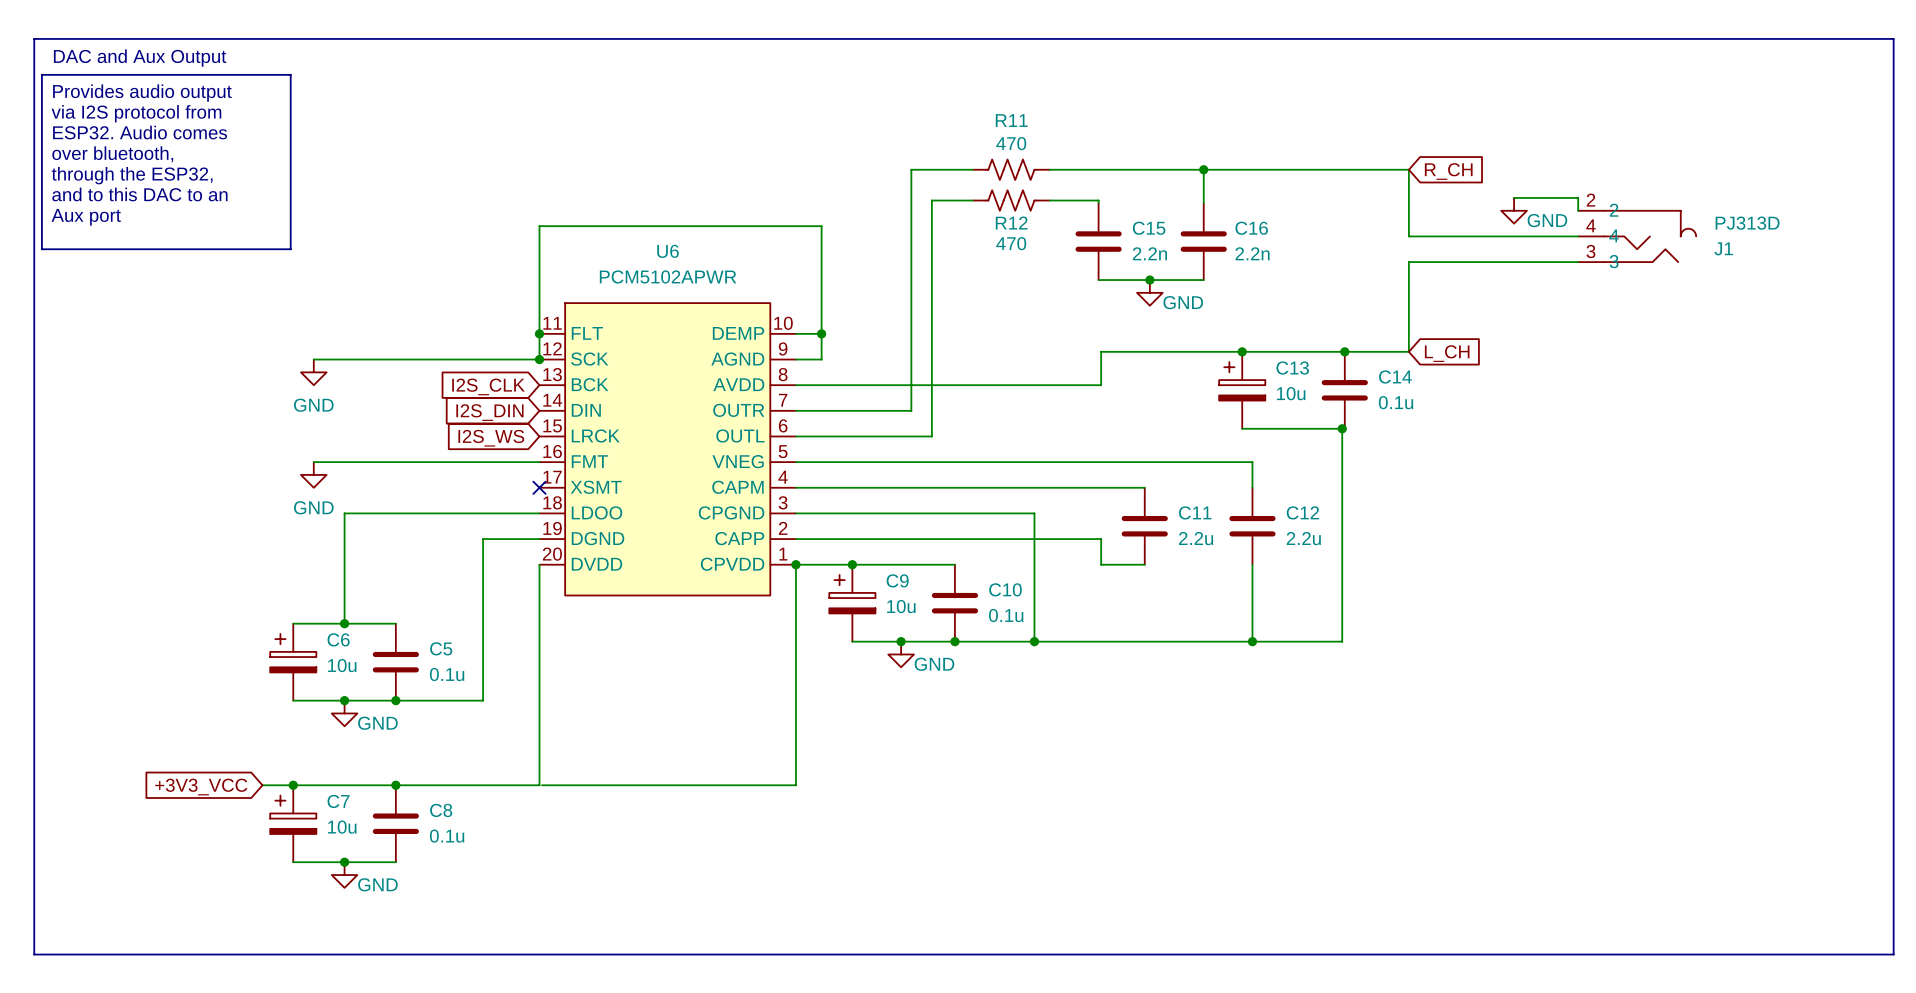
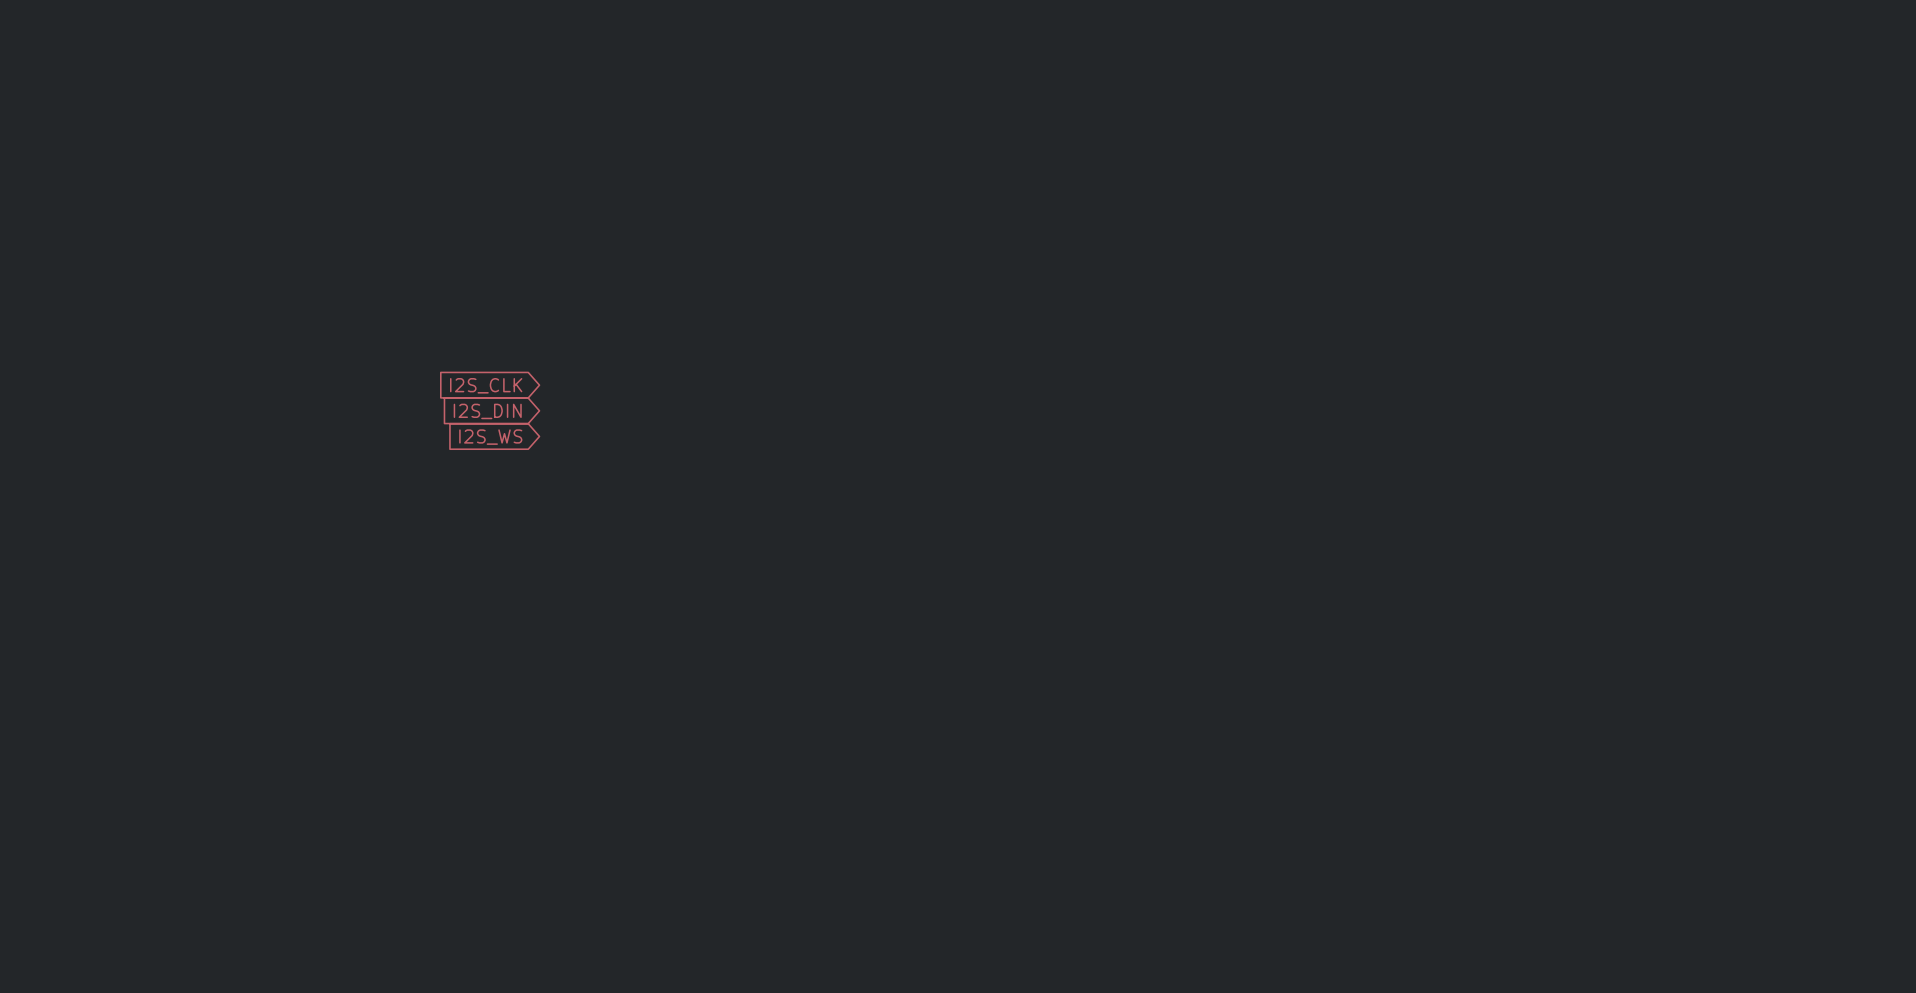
line: (34, 38) (1893, 38) (1893, 954) (34, 954) (34, 38) -> none
text: DAC and Aux Output (140, 58) -> none
line: (41, 74) (290, 74) (290, 249) (41, 249) (41, 74) -> none
text: Provides audio output (142, 93) -> none
text: via I2S protocol from (136, 113) -> none
text: ESP32. Audio comes (140, 132) -> none
text: over bluetooth, (112, 154) -> none
wire: (972, 169) (911, 169) (911, 410) (795, 410) -> none
R11: 470 (1011, 169) -> none
wire: (1049, 169) (1408, 169) (1408, 236) (1578, 236) -> none
wire: (1203, 169) (1203, 203) -> none
junction: (1203, 169) -> none
global label: R_CH (1448, 171) -> none
text: through the ESP32, (132, 175) -> none
text: and to this DAC to an (139, 194) -> none
wire: (1514, 197) (1578, 197) (1578, 210) -> none
wire: (972, 200) (931, 200) (931, 436) (795, 436) -> none
R12: 470 (1011, 200) -> none
wire: (1049, 200) (1098, 200) (1098, 203) -> none
power symbol: GND (1514, 210) -> none
text: Aux port (86, 217) -> none
J1: PJ313D (1637, 236) -> none
C15: 2.2n (1098, 241) -> none
C16: 2.2n (1203, 241) -> none
wire: (1578, 262) (1408, 262) (1408, 351) (1101, 351) (1101, 385) (795, 385) -> none
wire: (1098, 280) (1203, 280) -> none
junction: (1149, 280) -> none
power symbol: GND (1149, 292) -> none
junction: (539, 333) -> none
wire: (795, 333) (821, 333) -> none
junction: (821, 333) -> none
junction: (1242, 351) -> none
junction: (1344, 351) -> none
global label: L_CH (1447, 353) -> none
wire: (313, 359) (539, 359) (539, 226) (821, 226) (821, 359) (795, 359) -> none
junction: (539, 359) -> none
power symbol: GND (313, 372) -> none
C13: 10u (1242, 390) -> none
C14: 0.1u (1344, 390) -> none
wire: (1242, 428) (1344, 428) -> none
wire: (1342, 428) (1342, 641) (852, 641) -> none
junction: (1342, 428) -> none
U6: PCM5102APWR (667, 449) -> none
wire: (313, 462) (539, 462) -> none
wire: (795, 462) (1252, 462) (1252, 487) -> none
power symbol: GND (313, 474) -> none
no-connect mark: (539, 487) -> none
wire: (795, 487) (1144, 487) -> none
wire: (539, 513) (344, 513) (344, 623) -> none
wire: (795, 513) (1034, 513) (1034, 641) -> none
C11: 2.2u (1144, 526) -> none
C12: 2.2u (1252, 526) -> none
wire: (539, 539) (483, 539) (483, 700) (293, 700) -> none
wire: (795, 539) (1101, 539) (1101, 564) (1144, 564) -> none
wire: (539, 564) (539, 785) (262, 785) -> none
junction: (795, 564) -> none
junction: (852, 564) -> none
wire: (954, 564) (795, 564) (795, 785) (542, 785) -> none
wire: (1252, 564) (1252, 641) -> none
C9: 10u (852, 603) -> none
C10: 0.1u (954, 603) -> none
wire: (293, 623) (395, 623) -> none
junction: (344, 623) -> none
junction: (901, 641) -> none
junction: (954, 641) -> none
junction: (1034, 641) -> none
junction: (1252, 641) -> none
power symbol: GND (901, 654) -> none
C6: 10u (293, 662) -> none
C5: 0.1u (395, 662) -> none
junction: (344, 700) -> none
junction: (395, 700) -> none
power symbol: GND (344, 713) -> none
junction: (293, 785) -> none
junction: (395, 785) -> none
global label: +3V3_VCC (201, 787) -> none
C7: 10u (293, 823) -> none
C8: 0.1u (395, 823) -> none
wire: (293, 862) (395, 862) -> none
junction: (344, 862) -> none
power symbol: GND (344, 875) -> none

